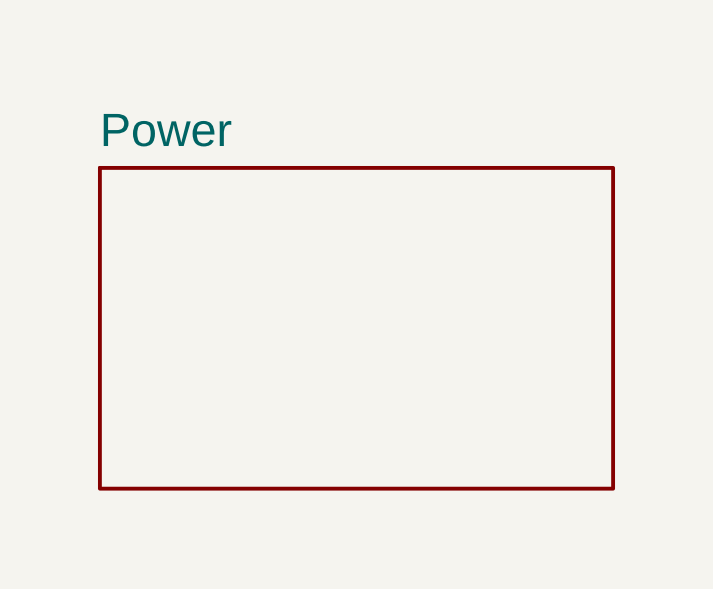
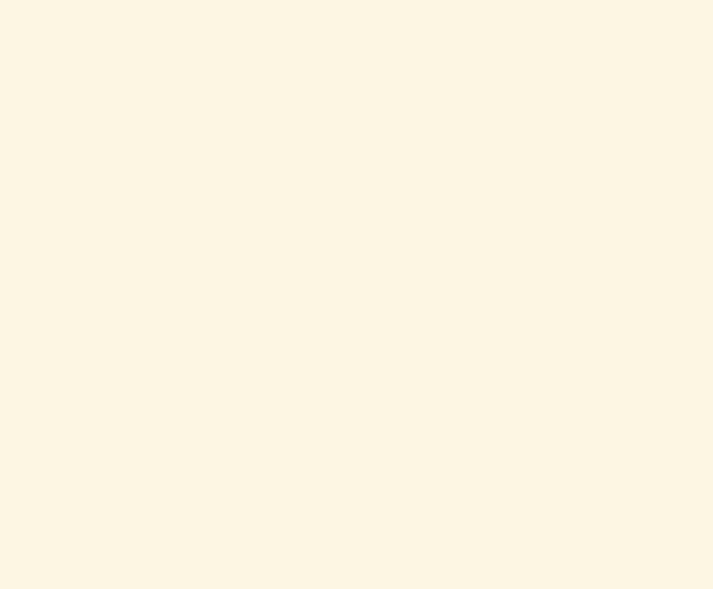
sheet Power: (356, 328) -> none

